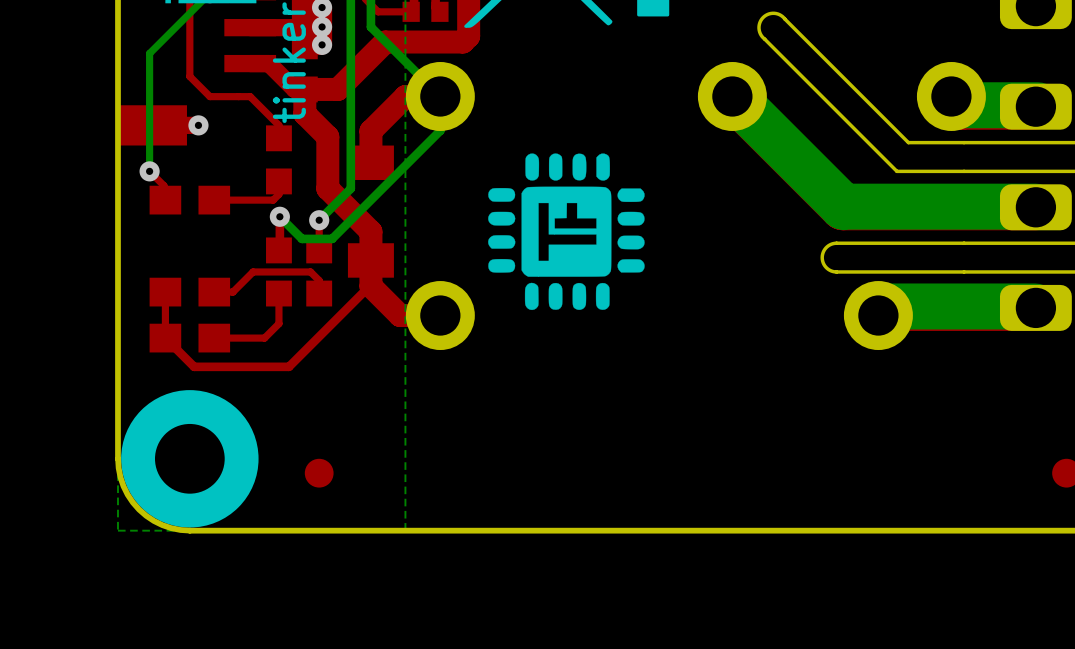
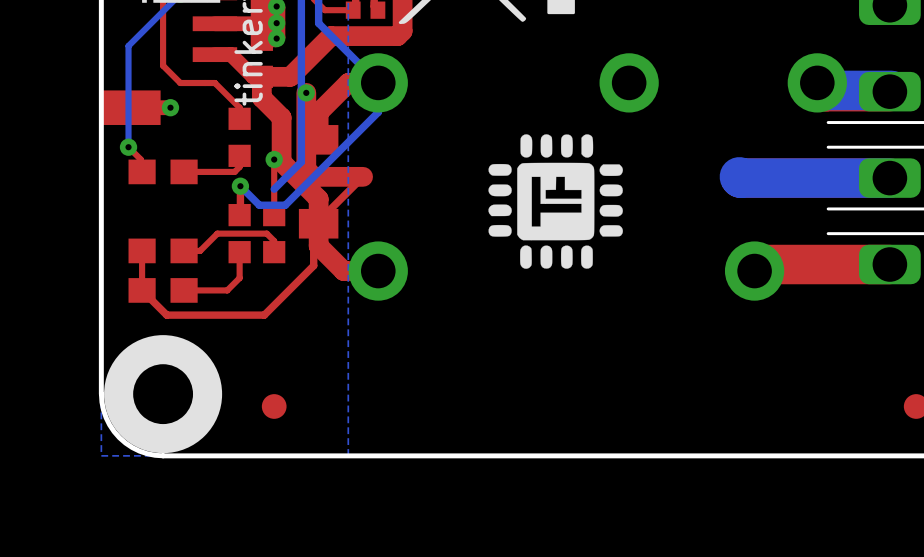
bottom track: (732, 95) (843, 206) (1035, 206) -> (739, 176) (889, 178)
via: none -> (306, 92)
board edge: (964, 142) (908, 142) (782, 16) (770, 13) (761, 20) (759, 28) (762, 36) (896, 171) (964, 171) -> none
top track: none -> (274, 159) (274, 189)
via position: (319, 220) -> (274, 159)
drawing position: (566, 231) -> (555, 201)
board edge: (964, 243) (834, 243) (825, 248) (822, 257) (825, 267) (834, 271) (964, 271) -> none
top track: (370, 260) (370, 284) (289, 366) -> (306, 92) (306, 169) (313, 176) (363, 176) (313, 226) (313, 265) (264, 315) (248, 315)
bottom track: (1035, 306) (885, 306) -> none

